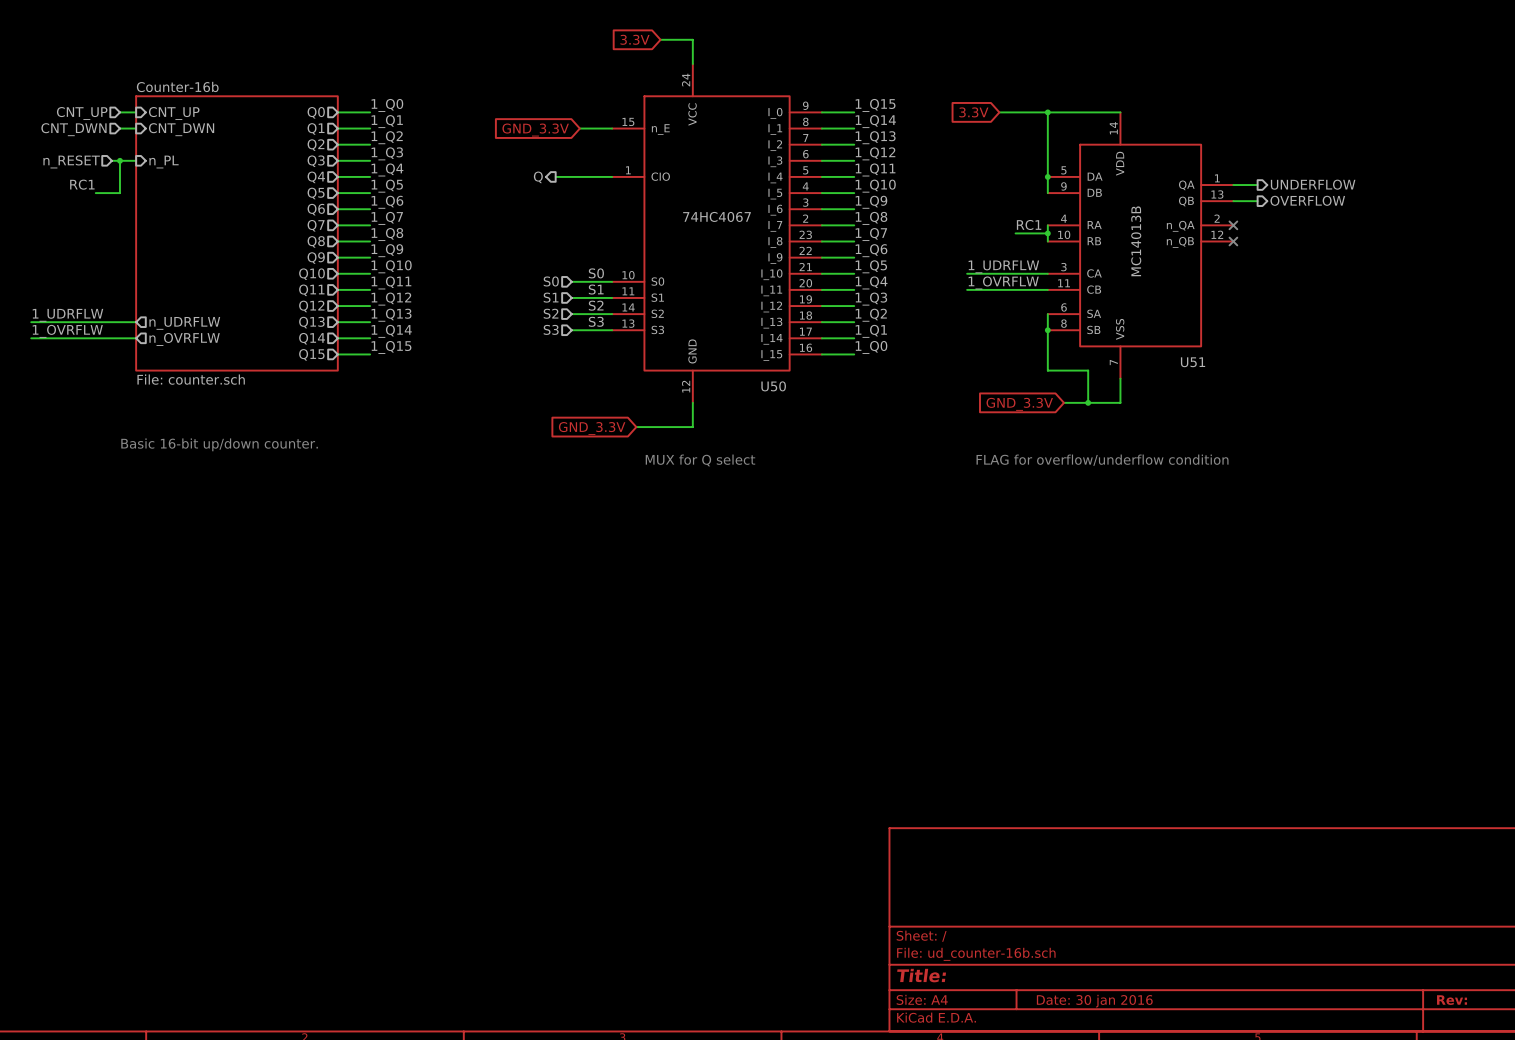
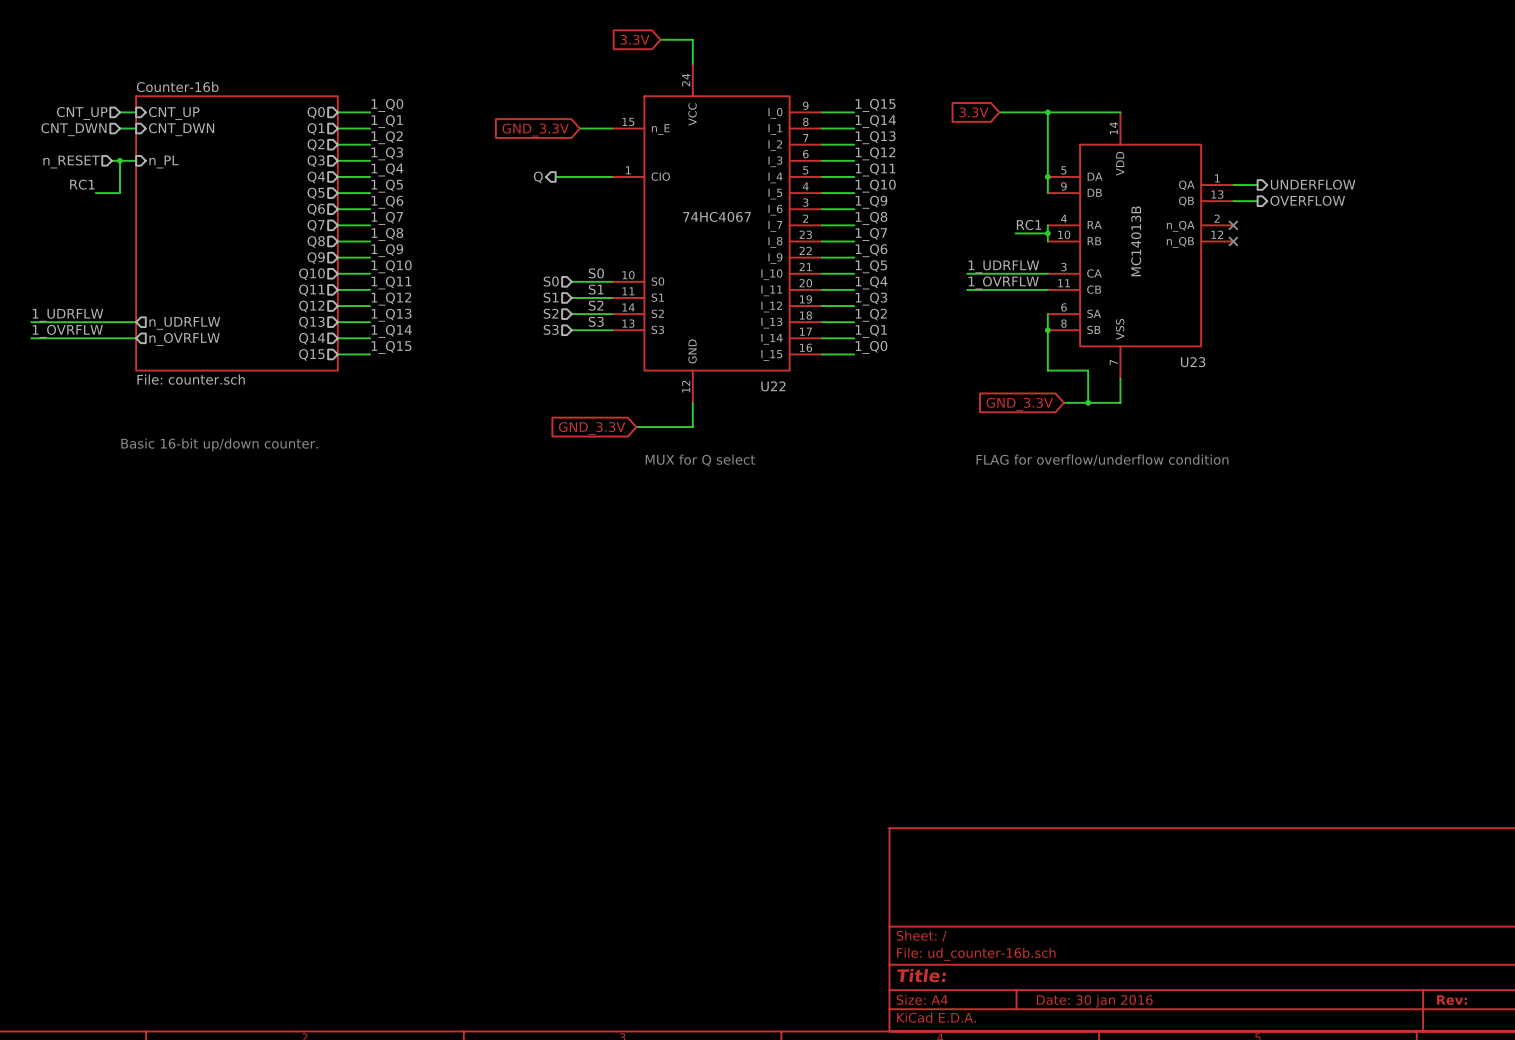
U51 name: U51 (1193, 362) -> U23 (1193, 362)
U50 name: U50 (773, 386) -> U22 (773, 386)

